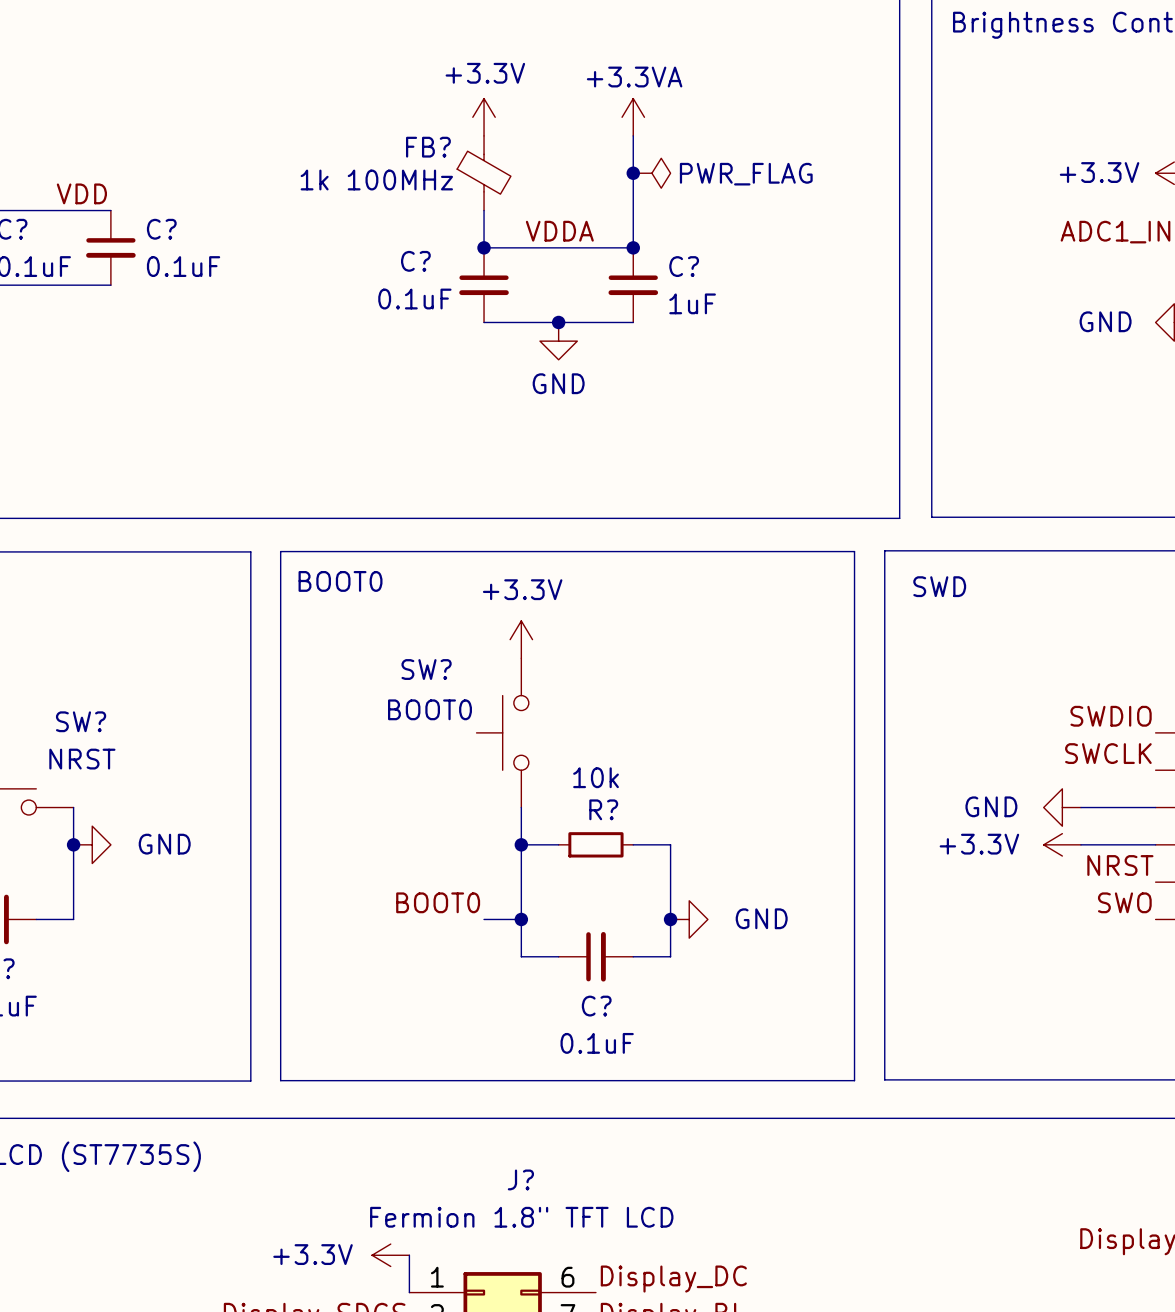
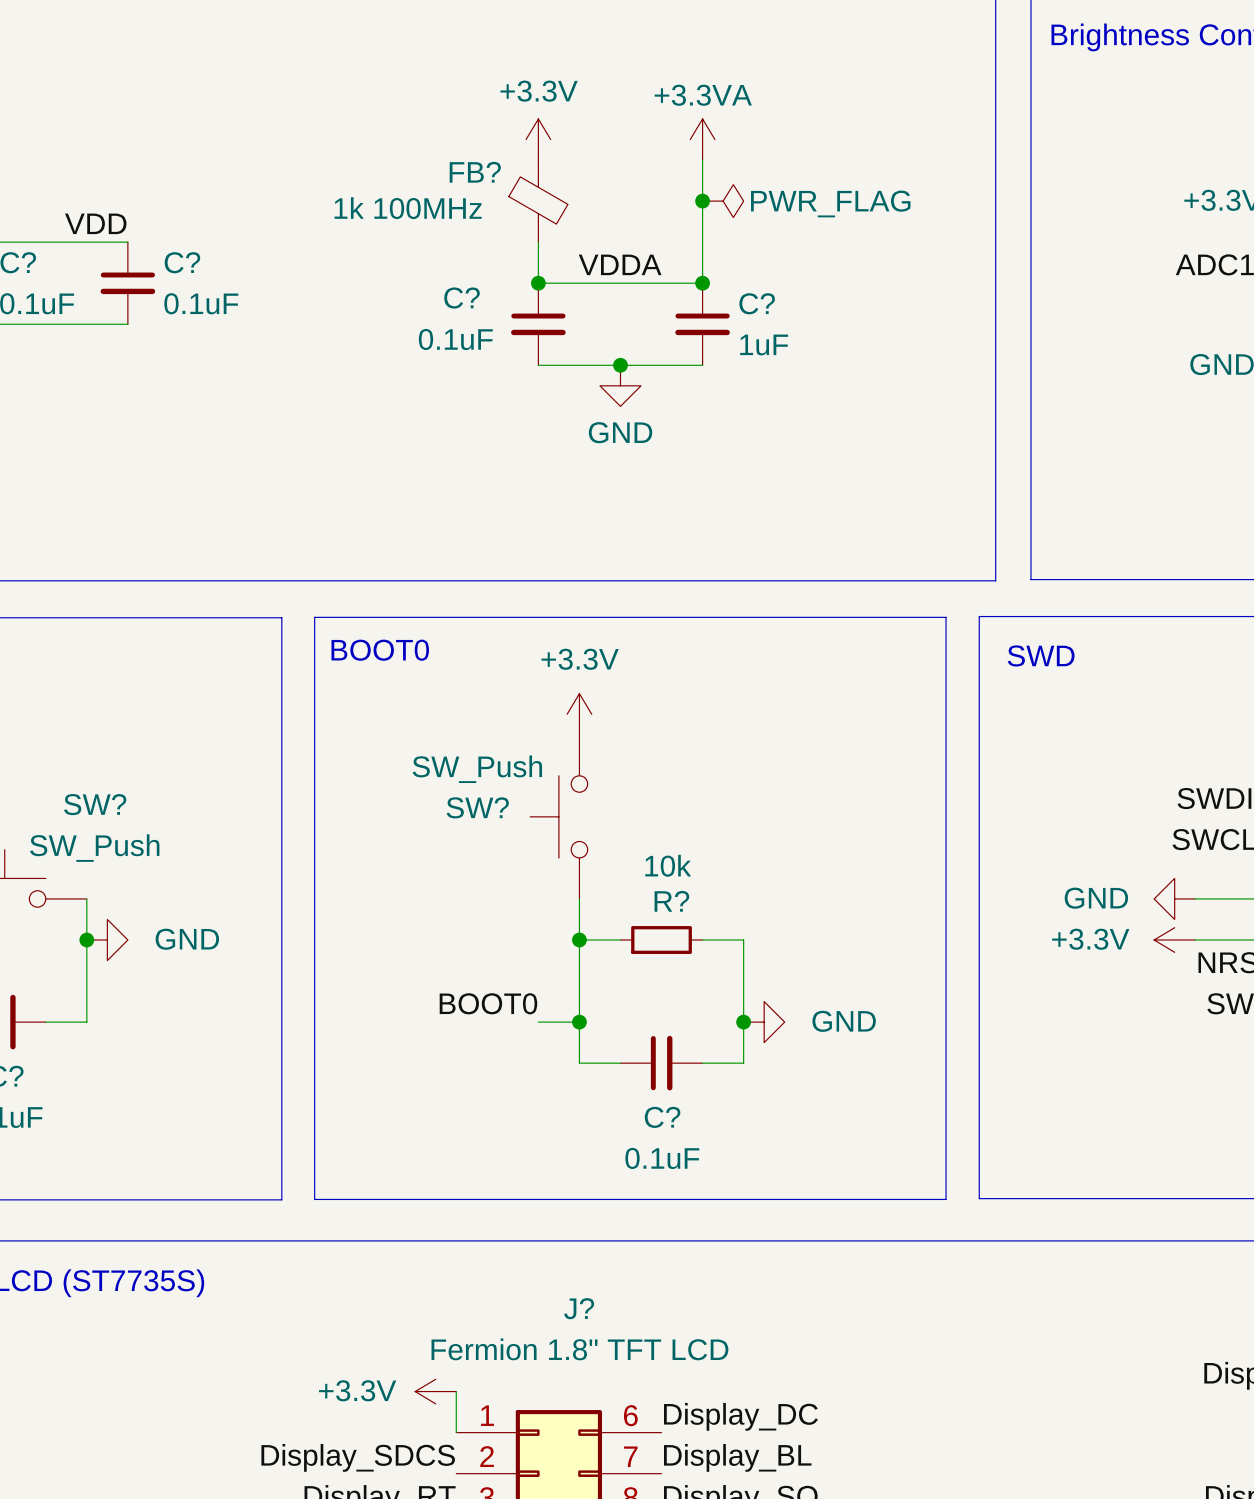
SW? name position: SW? (426, 669) -> SW? (477, 807)
SW? value: BOOT0 (429, 709) -> SW_Push (477, 769)
SW? value: NRST (82, 759) -> SW_Push (94, 848)

